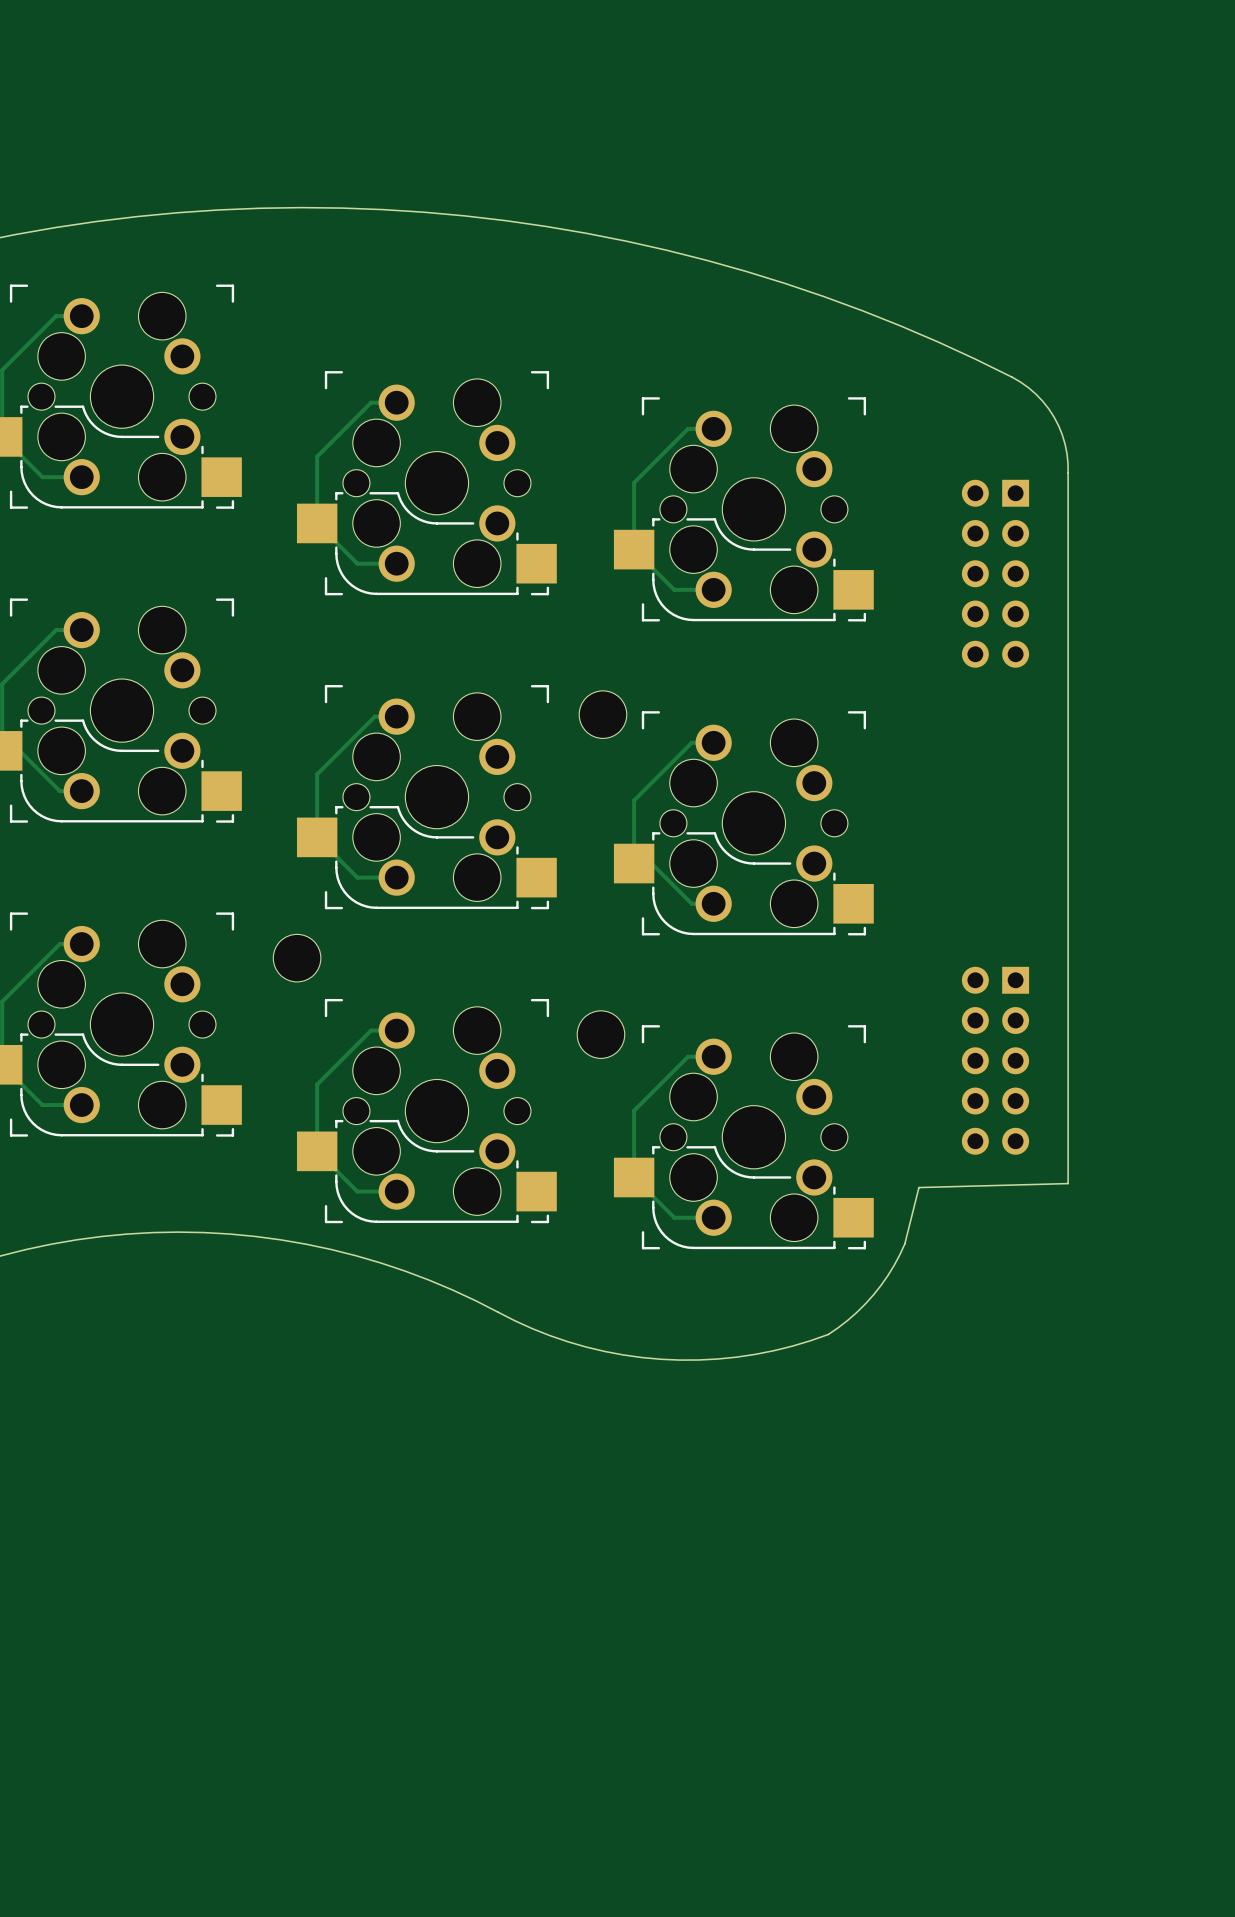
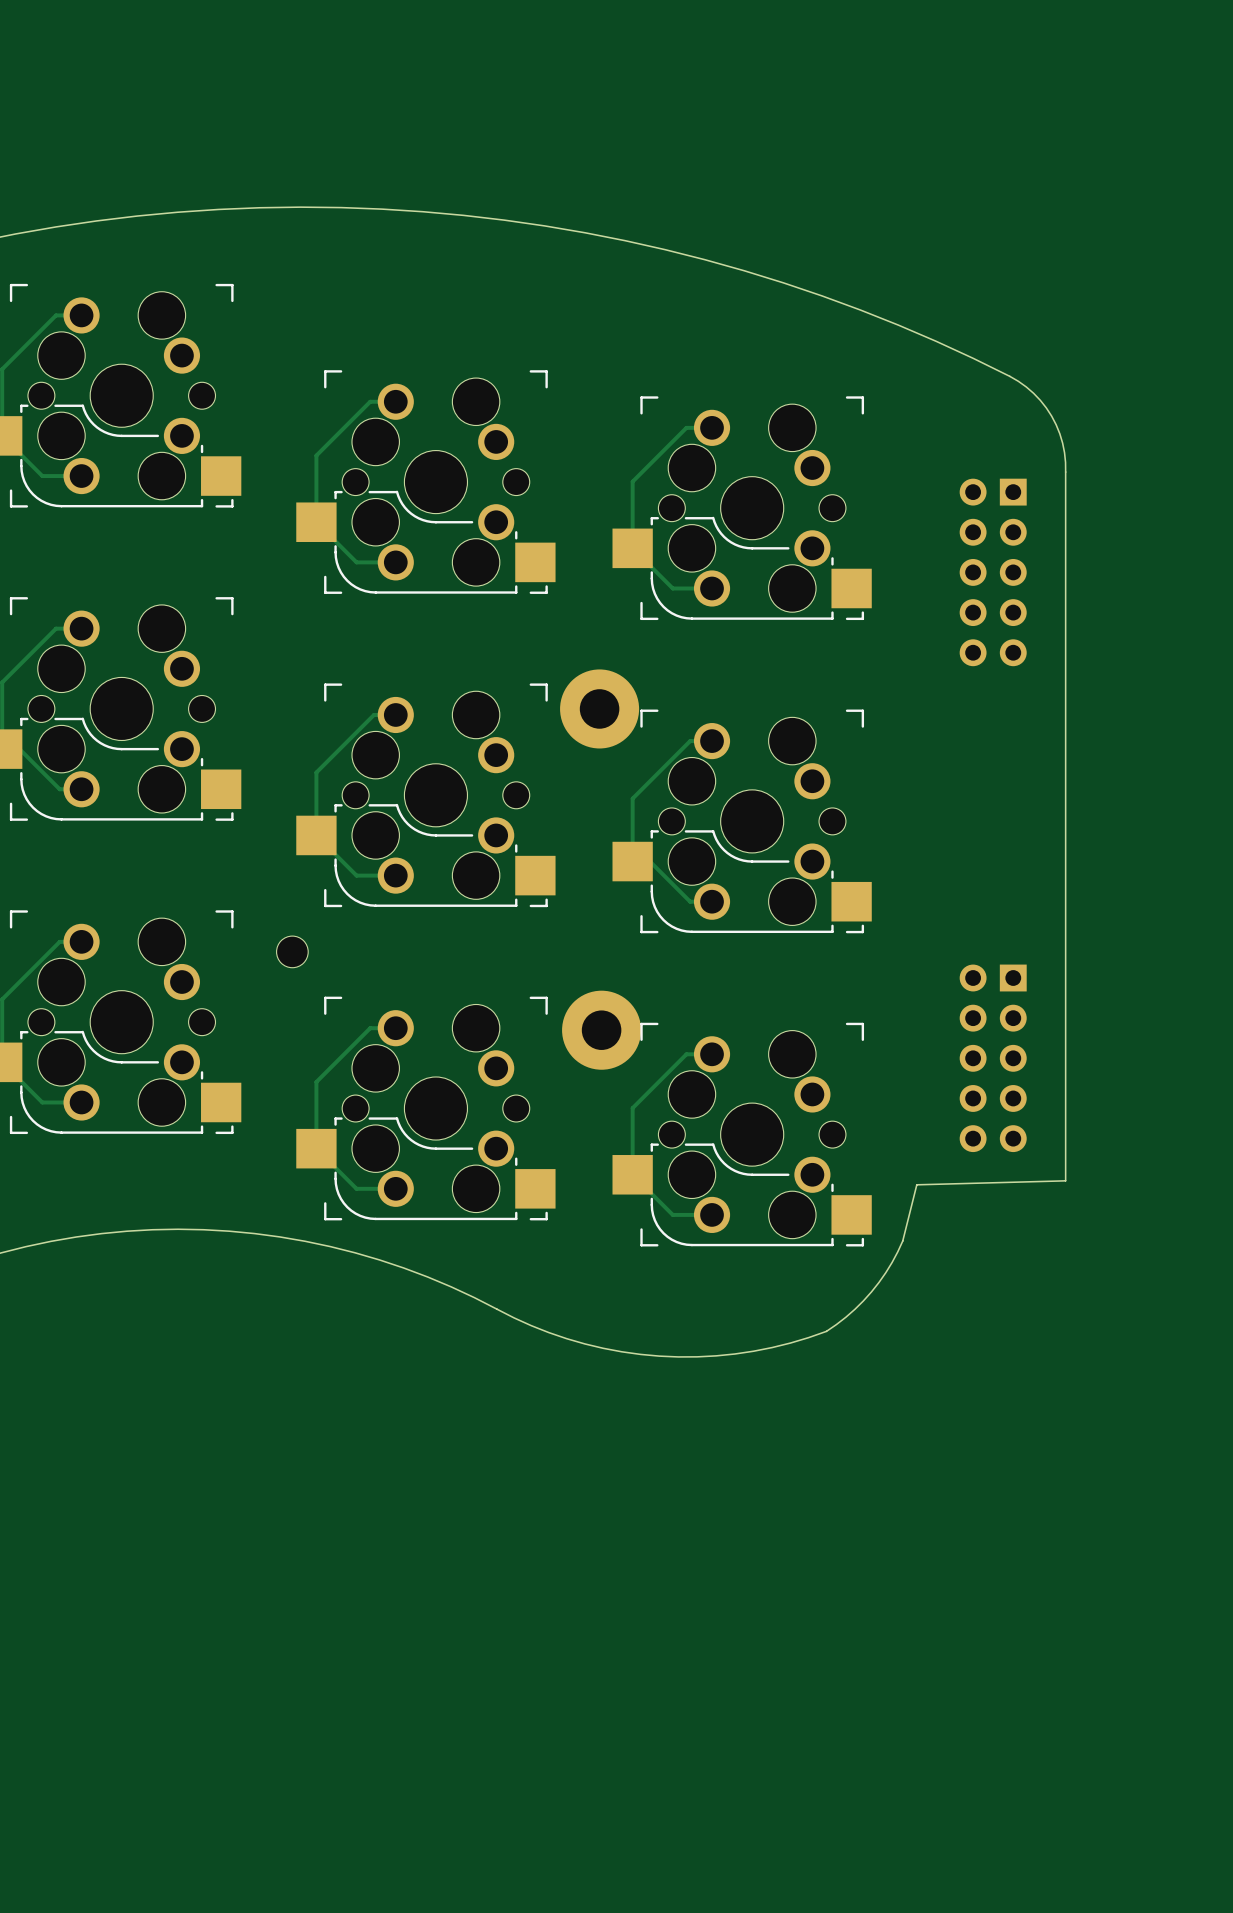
part footprint: [579, 690, 627, 739] -> [560, 669, 640, 749]
part footprint: [273, 934, 321, 982] -> [276, 936, 309, 968]
part footprint: [577, 1010, 625, 1059] -> [562, 990, 642, 1070]

